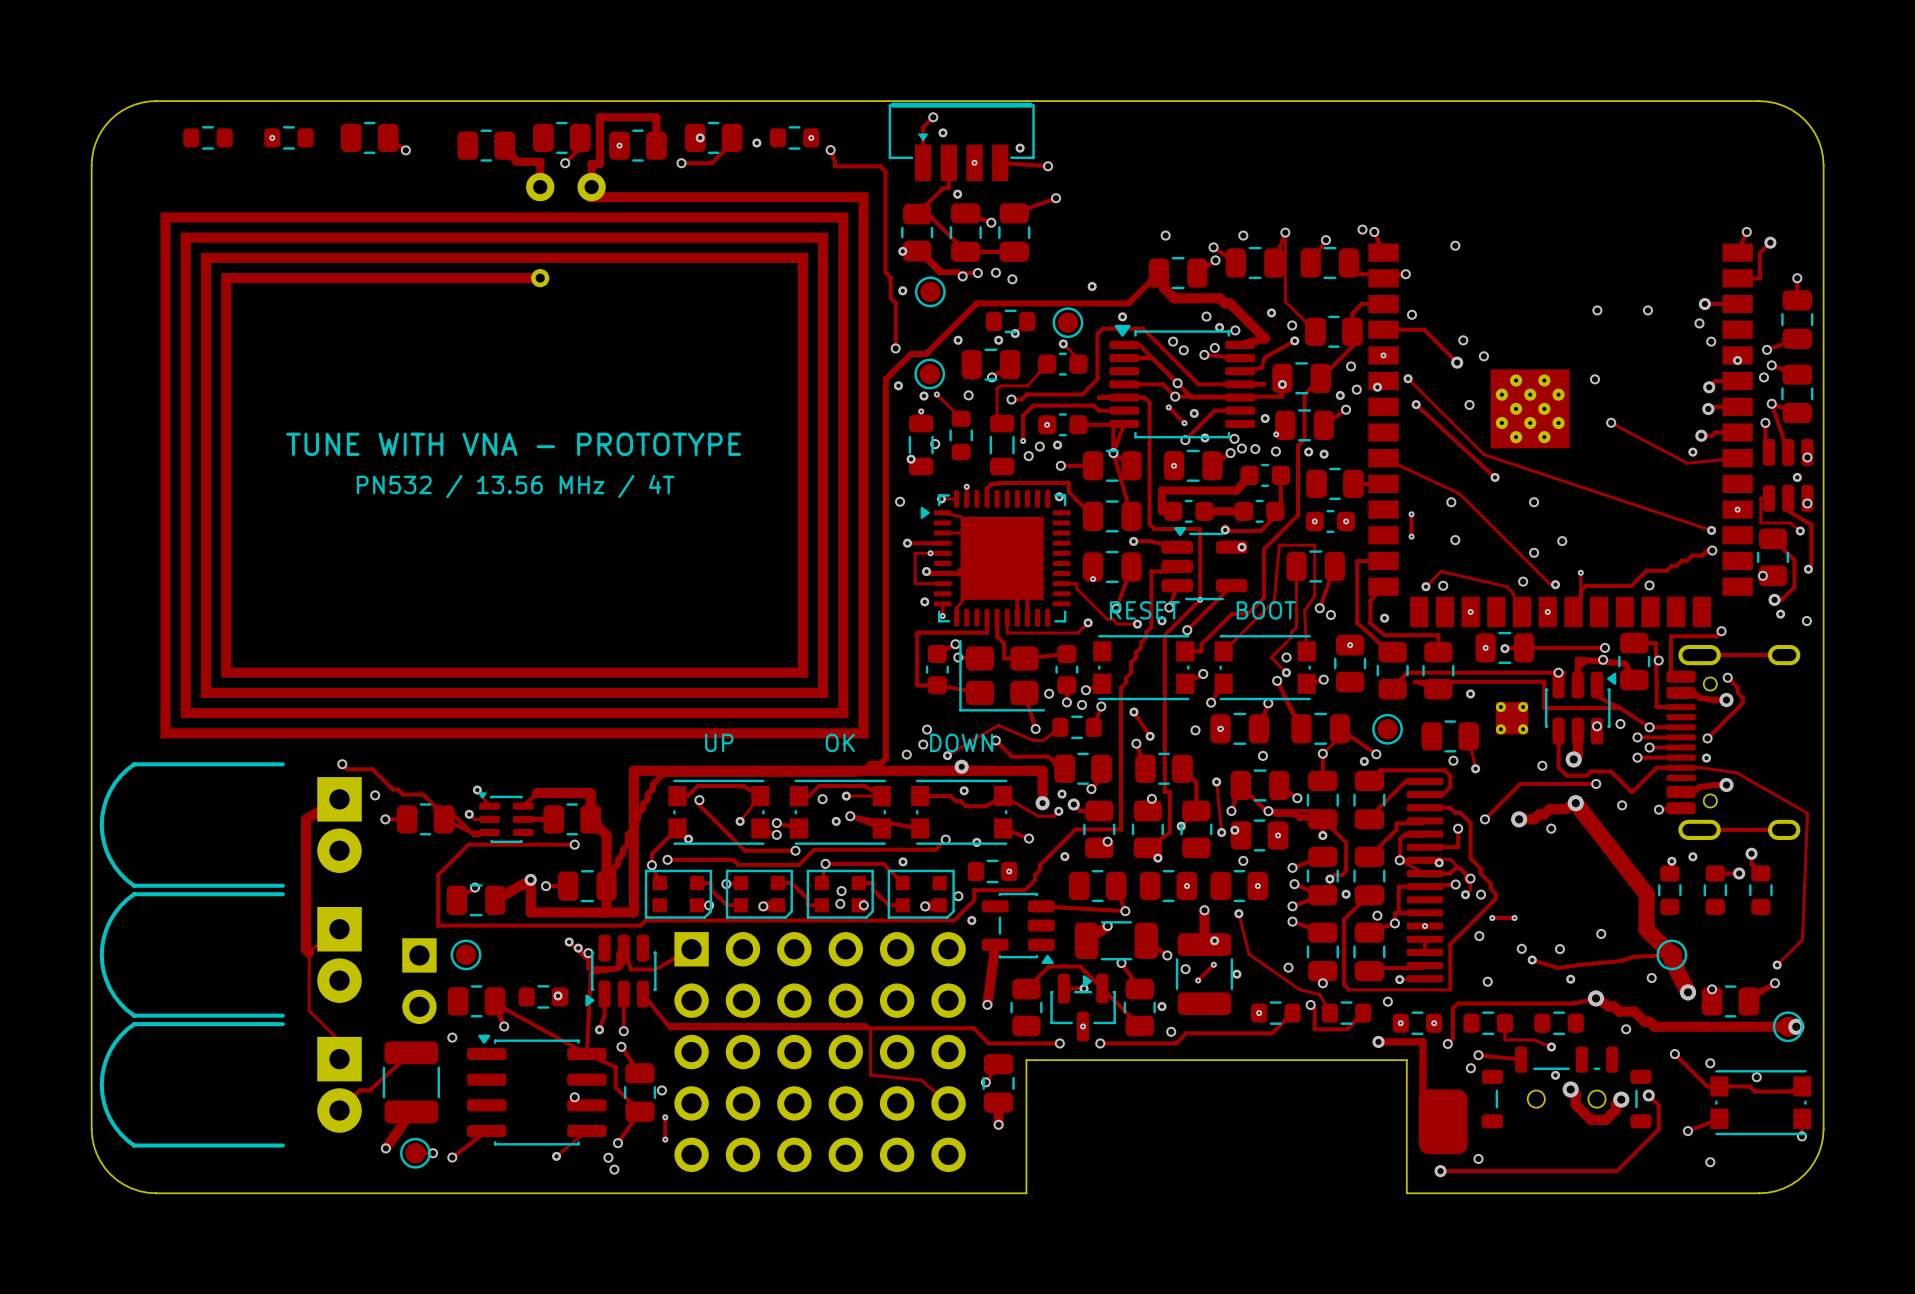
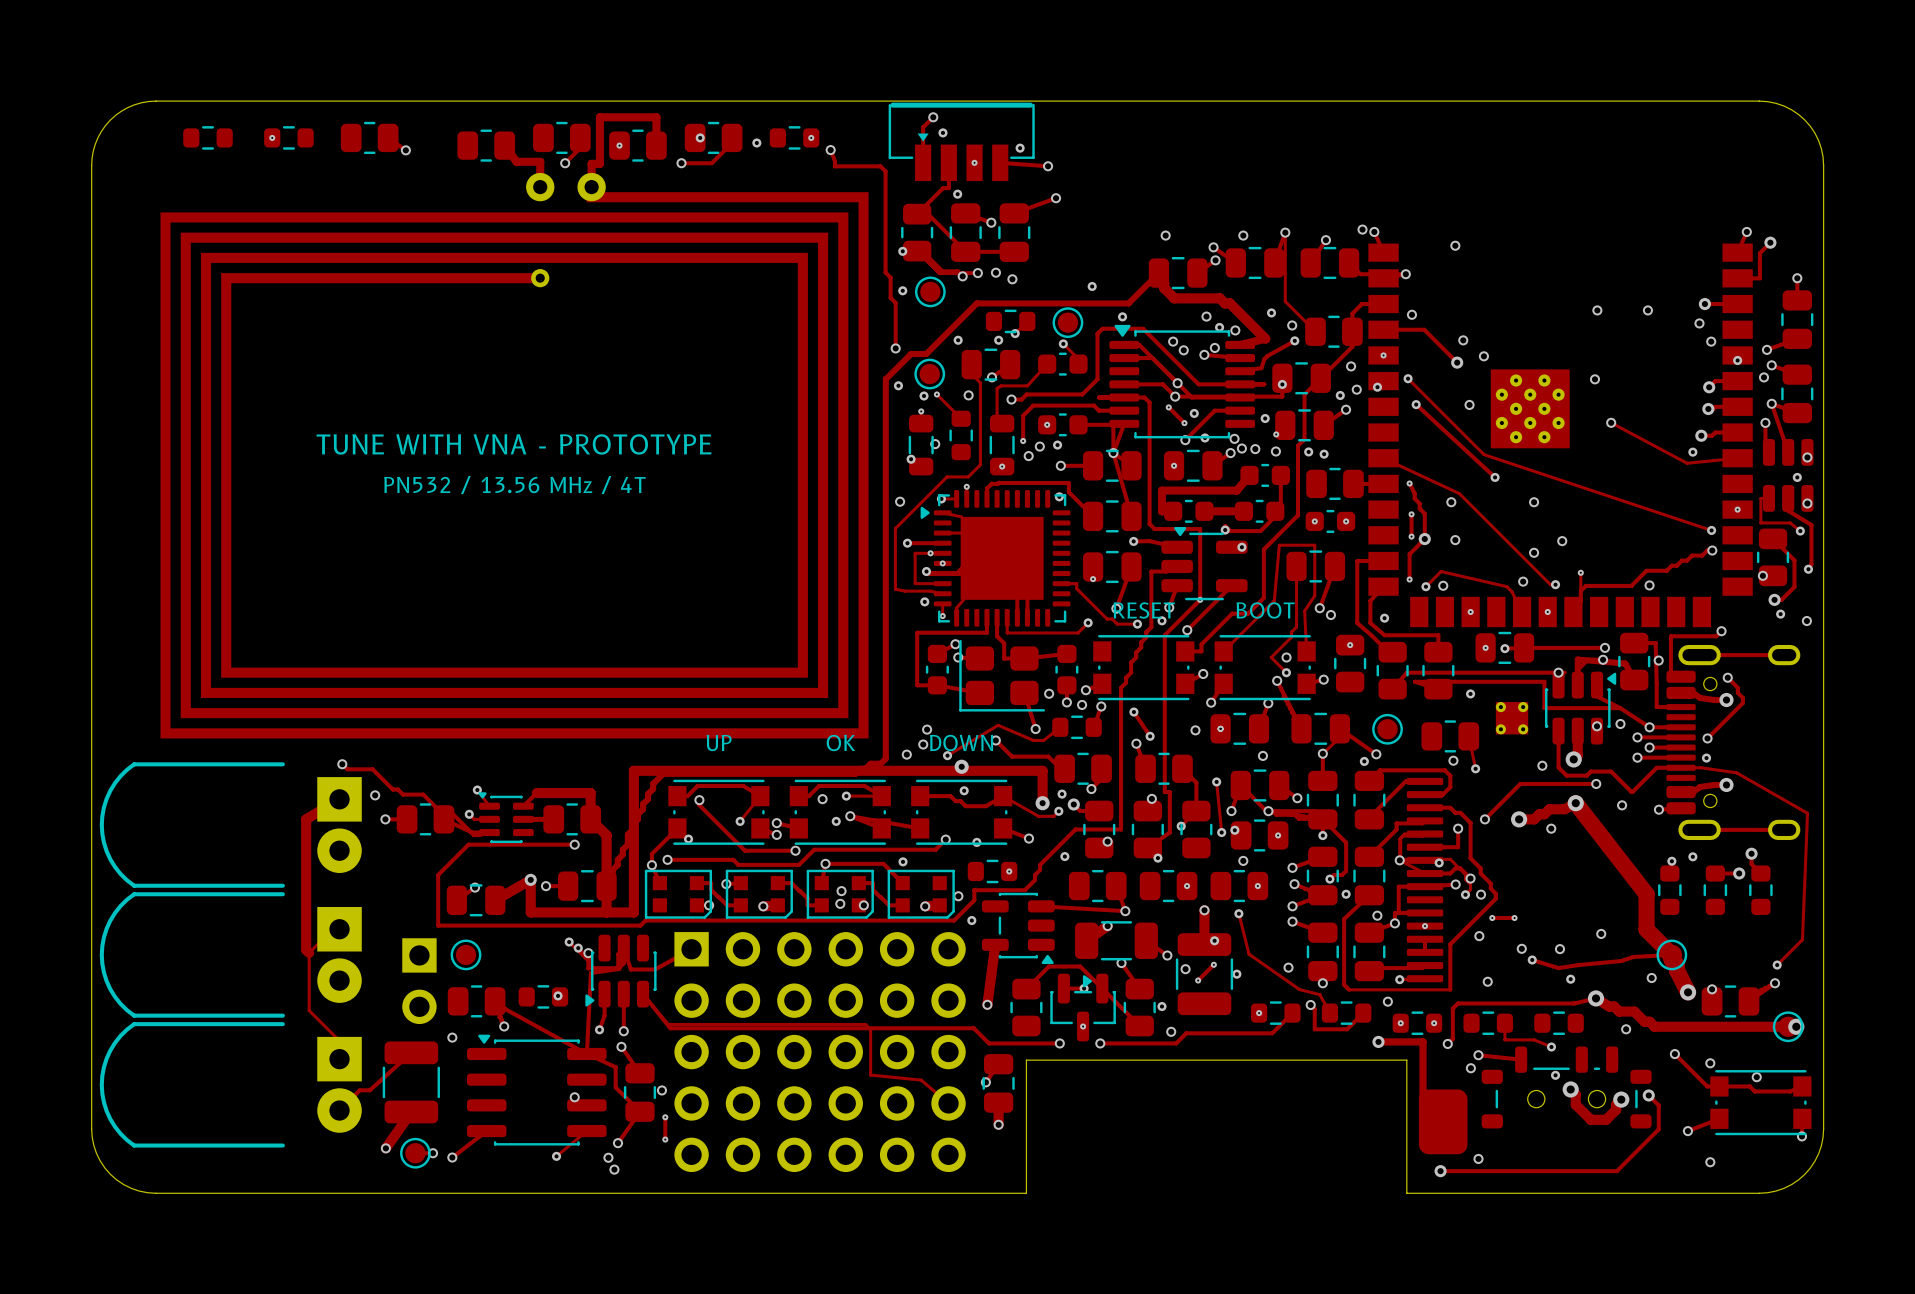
track: none -> (971, 364) (971, 373) (980, 382) (980, 464) (968, 476) (947, 476) (895, 528) (895, 589) (942, 593)
via: none -> (1002, 466)
track: none -> (1409, 483) (1414, 493) (1414, 498) (1419, 503) (1419, 508) (1424, 513) (1424, 539) (1409, 554) (1409, 579)
via: none -> (1409, 483)
via: none -> (1424, 539)
via: none -> (942, 563)
via: none -> (1409, 579)

